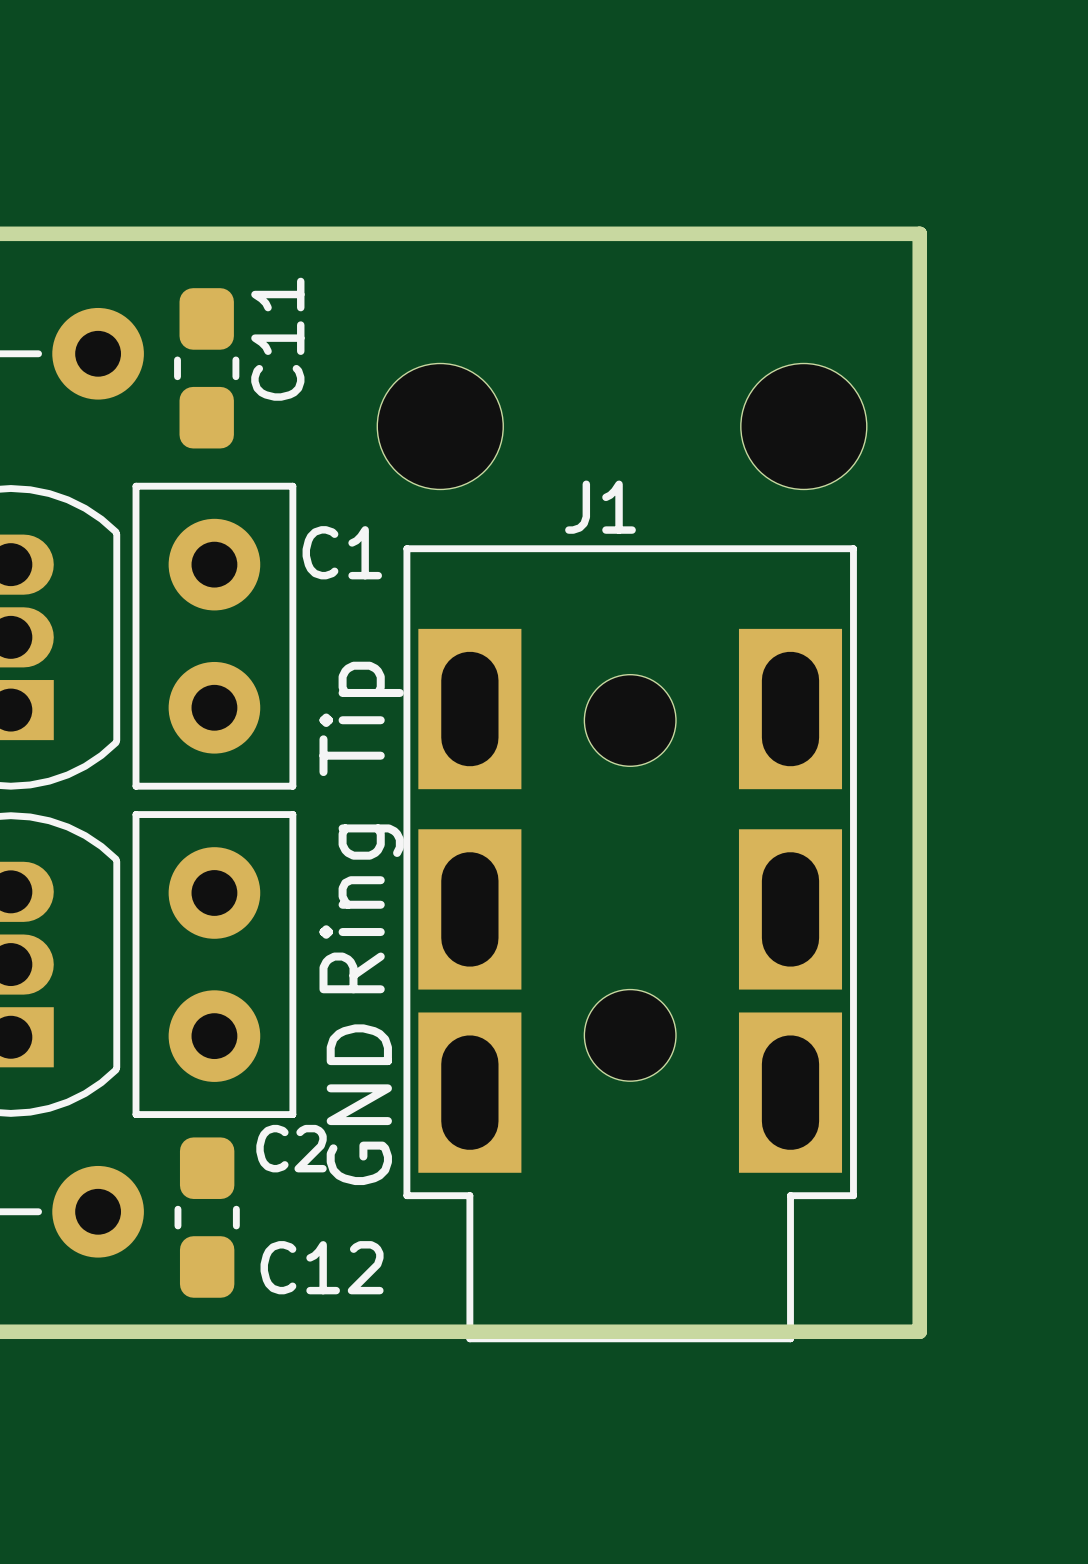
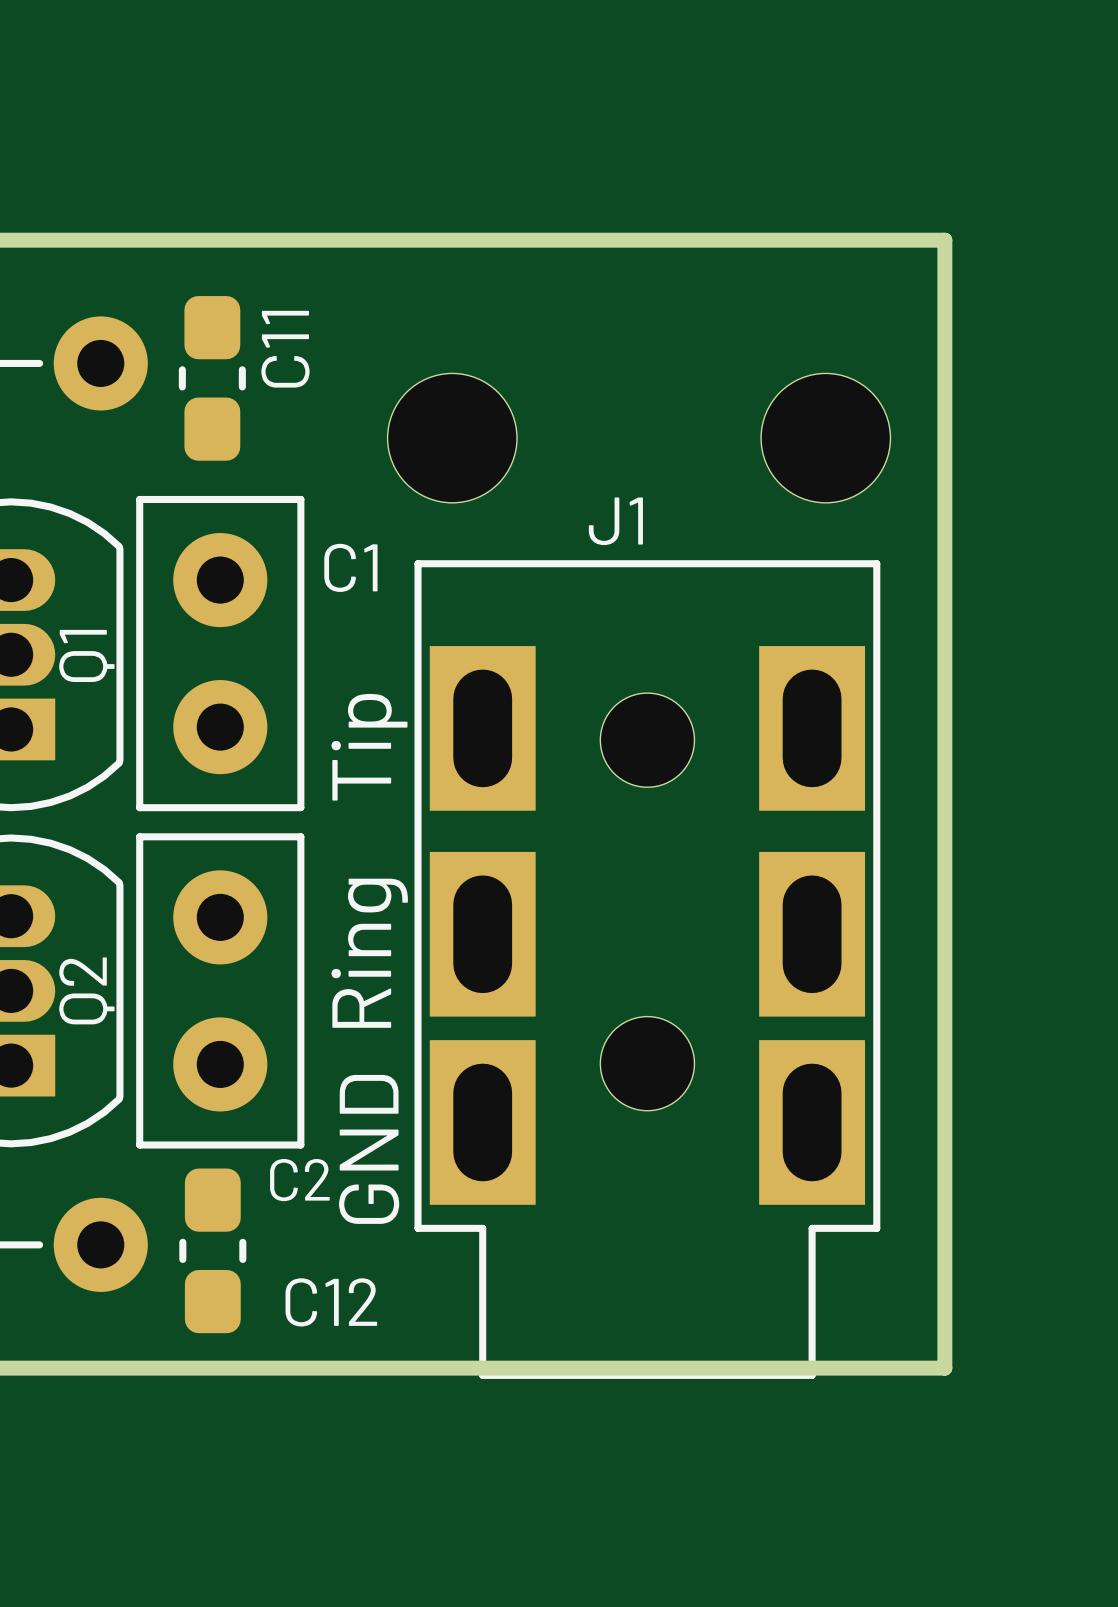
Q1 name: none -> Q1 (86, 655)
Q2 name: none -> Q2 (86, 990)

